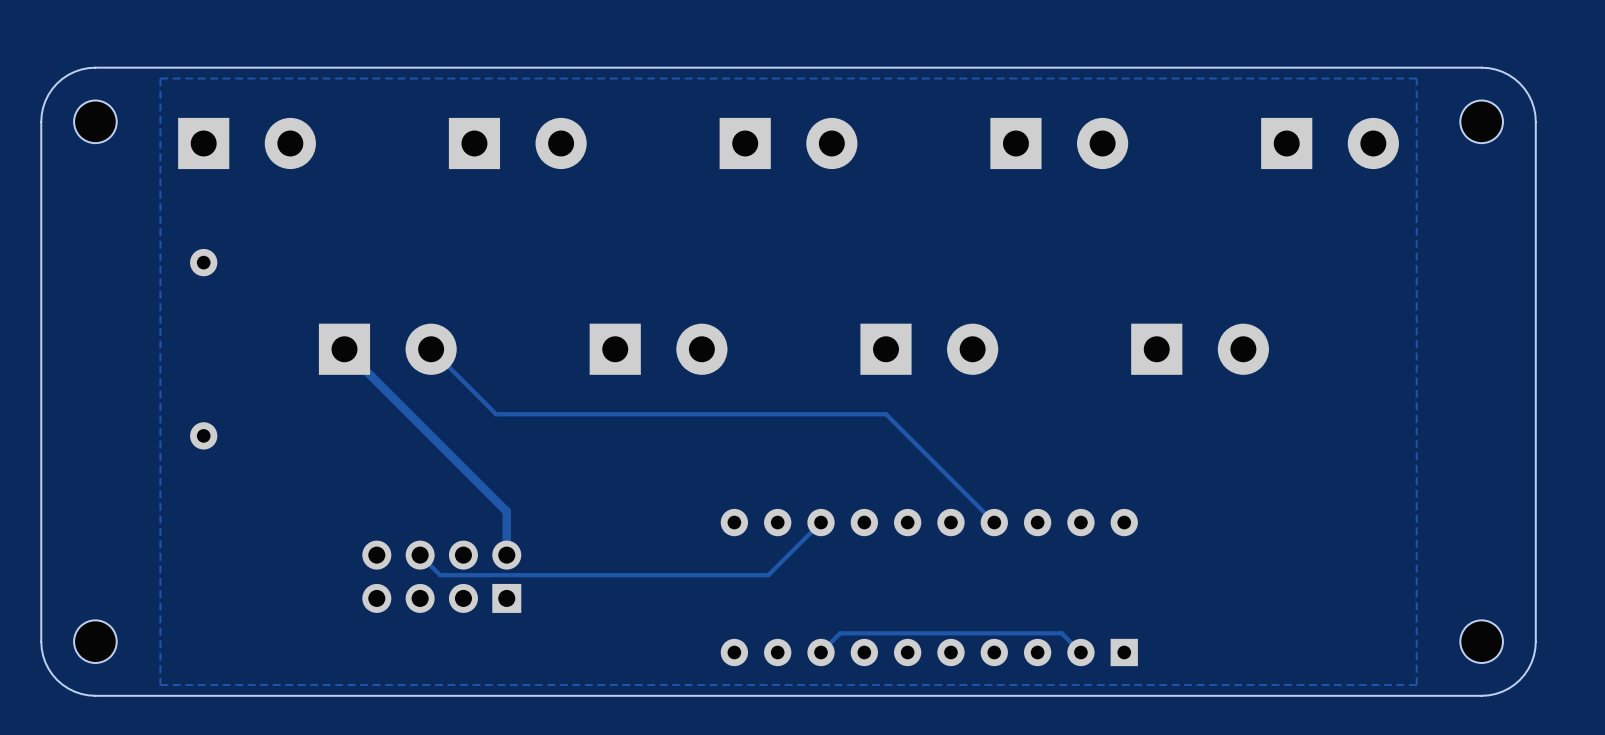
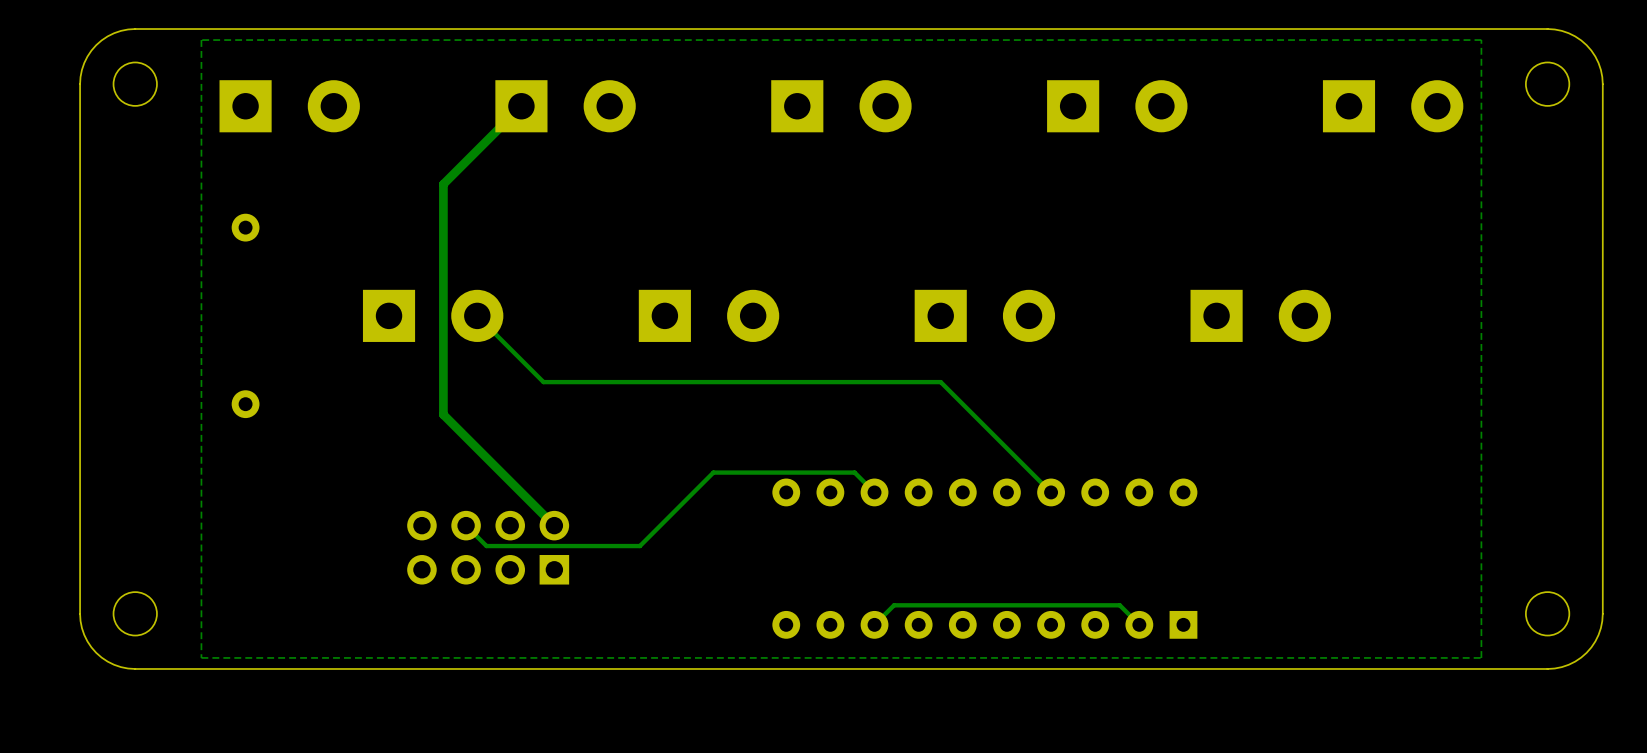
track: (344, 349) (506, 511) (506, 555) -> (521, 106) (443, 184) (443, 414) (554, 525)
track: (821, 522) (768, 575) (590, 575) -> (874, 492) (854, 472) (713, 472) (639, 546)

